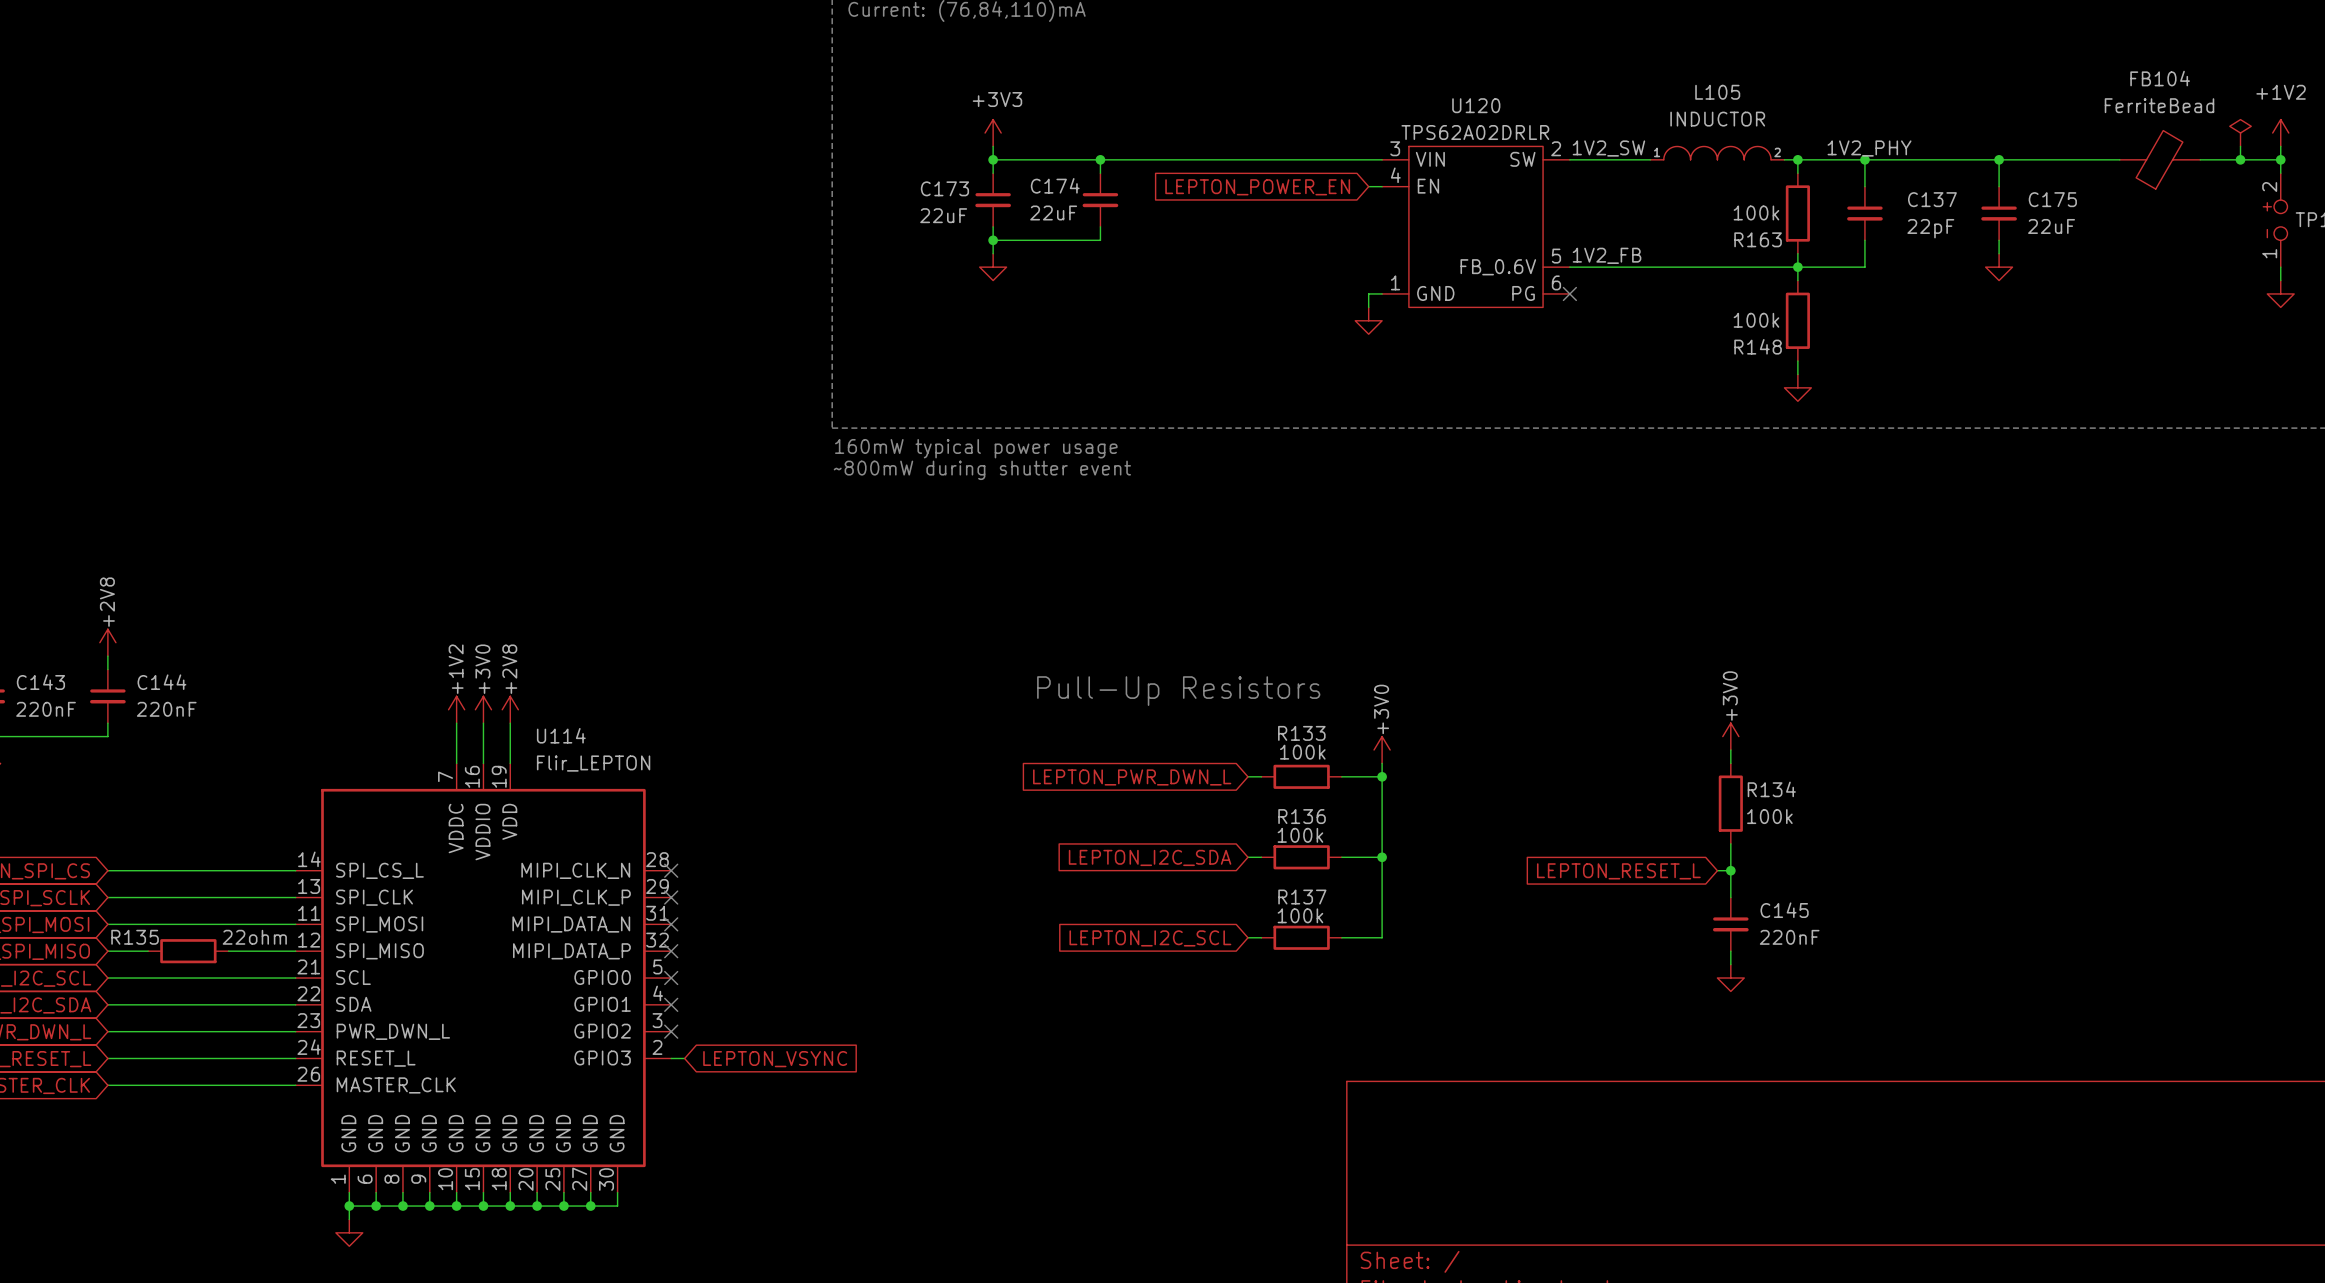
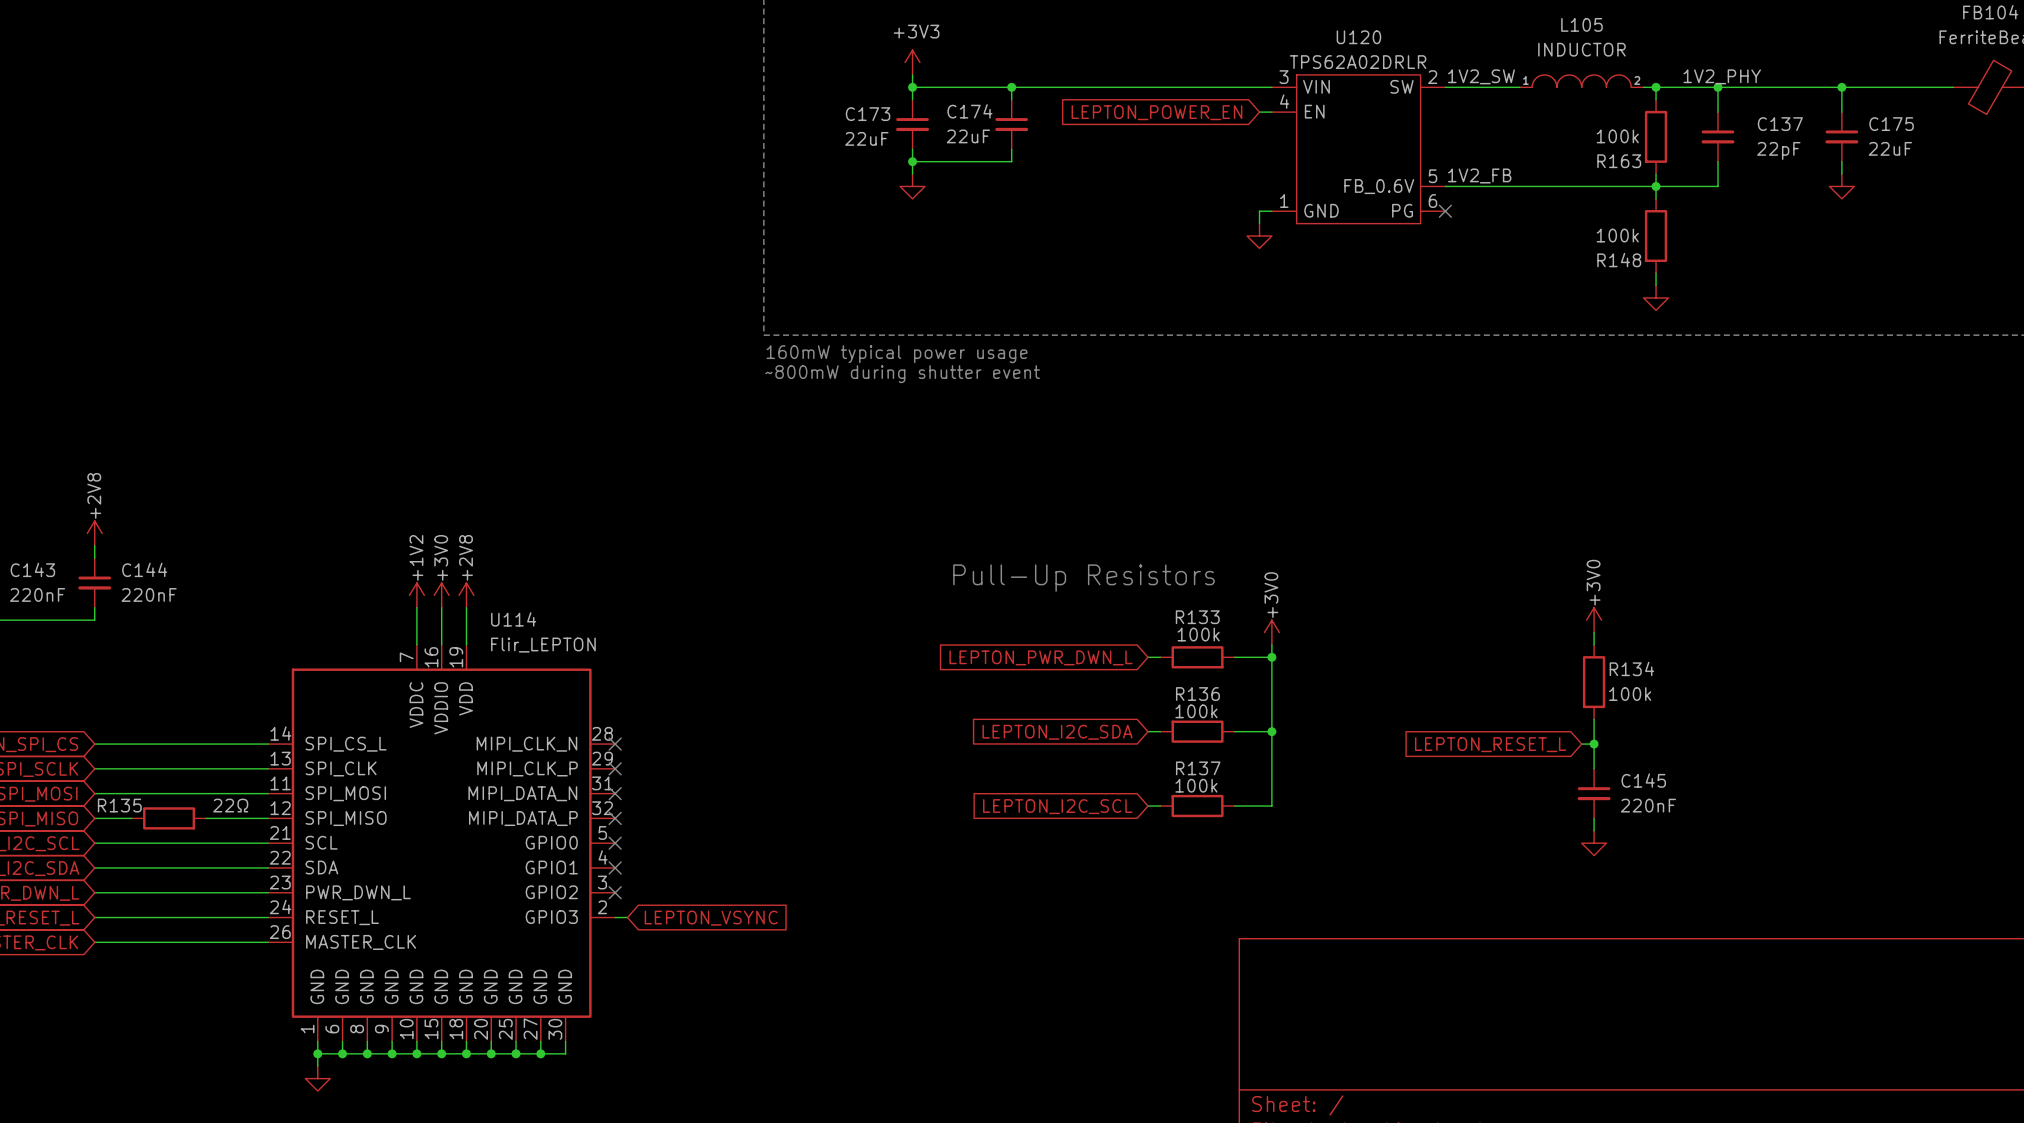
R135 value: 22ohm (254, 937) -> 22Ω (230, 805)

